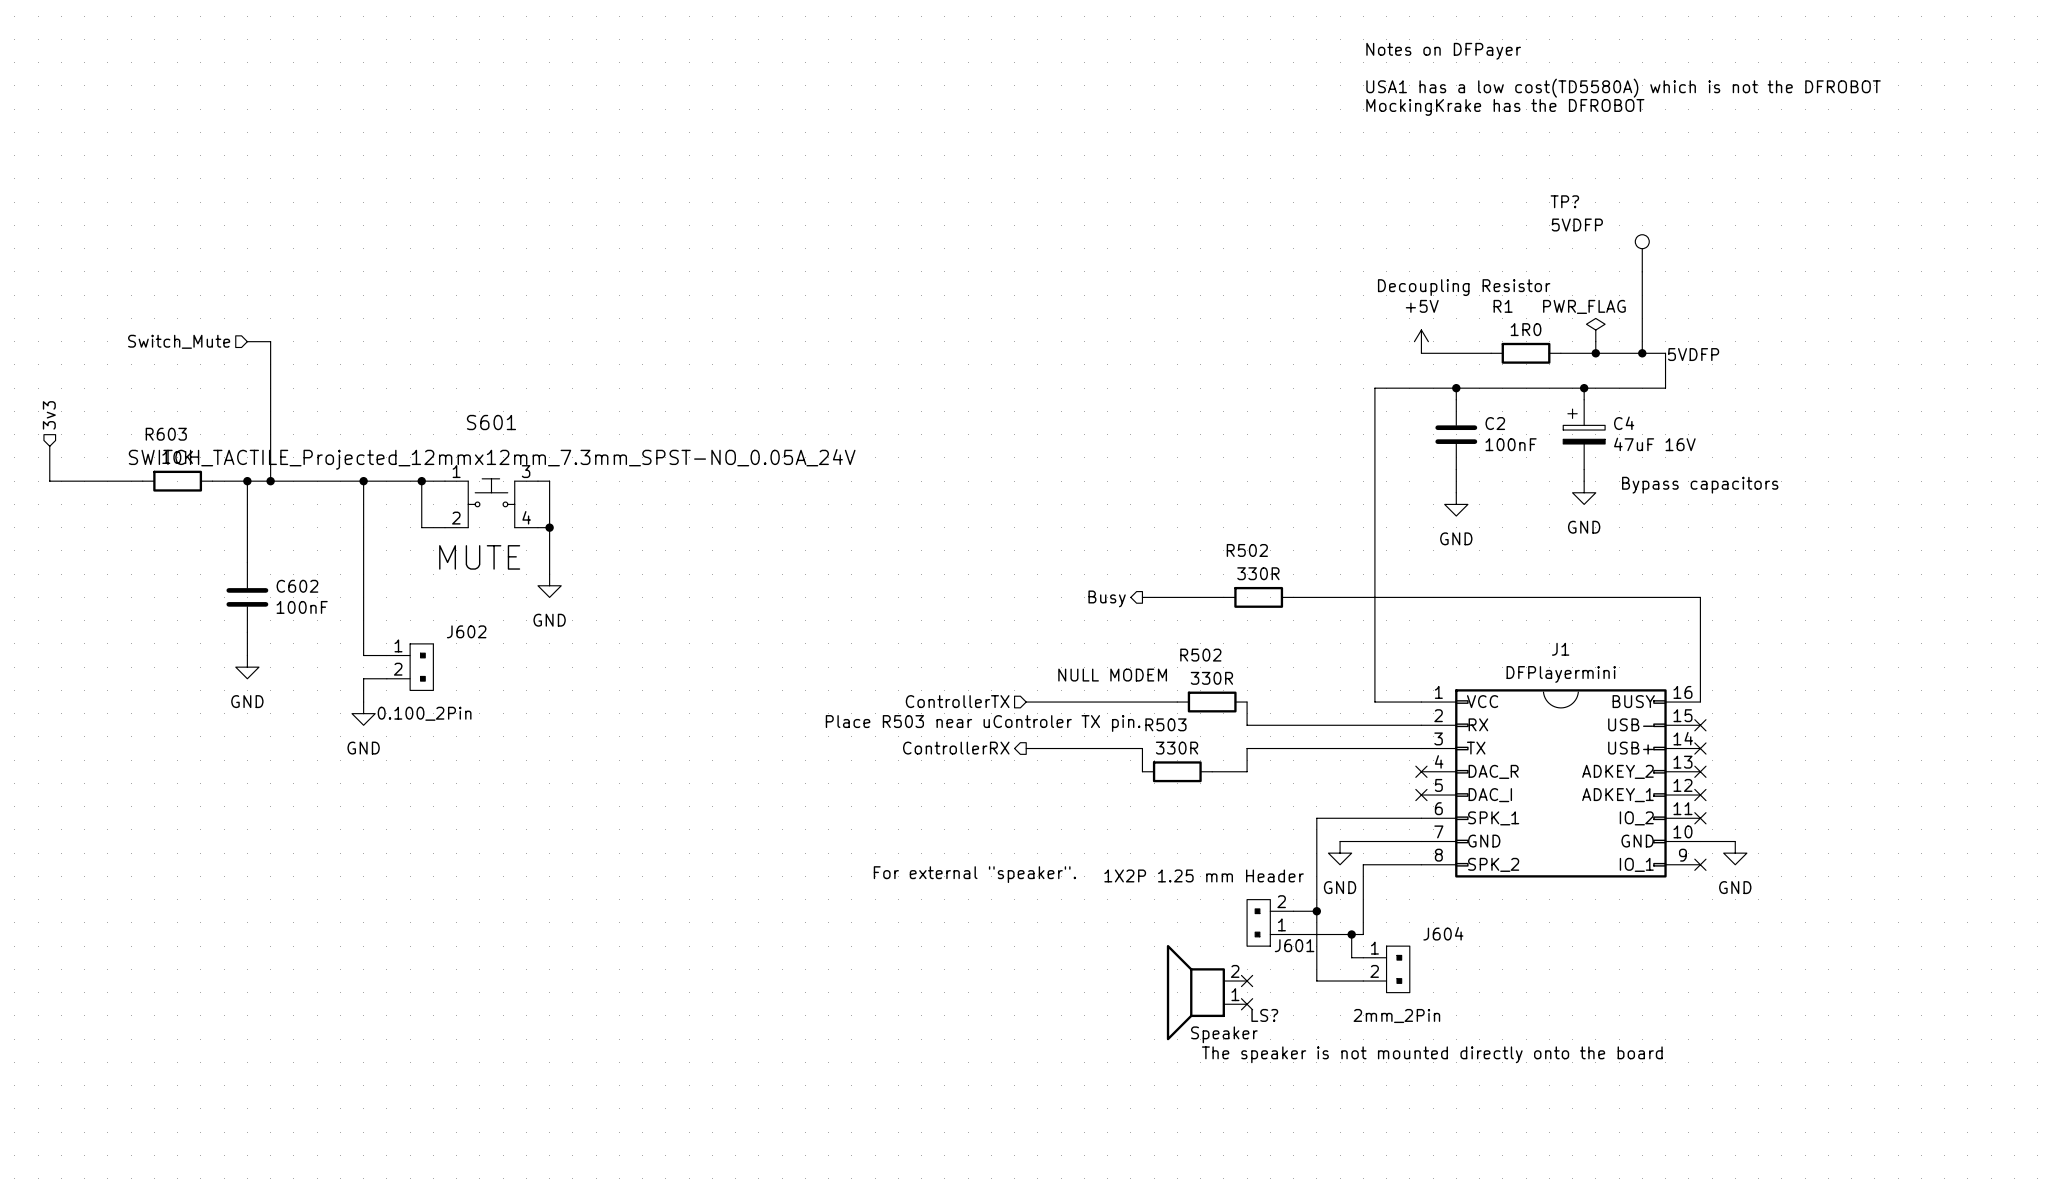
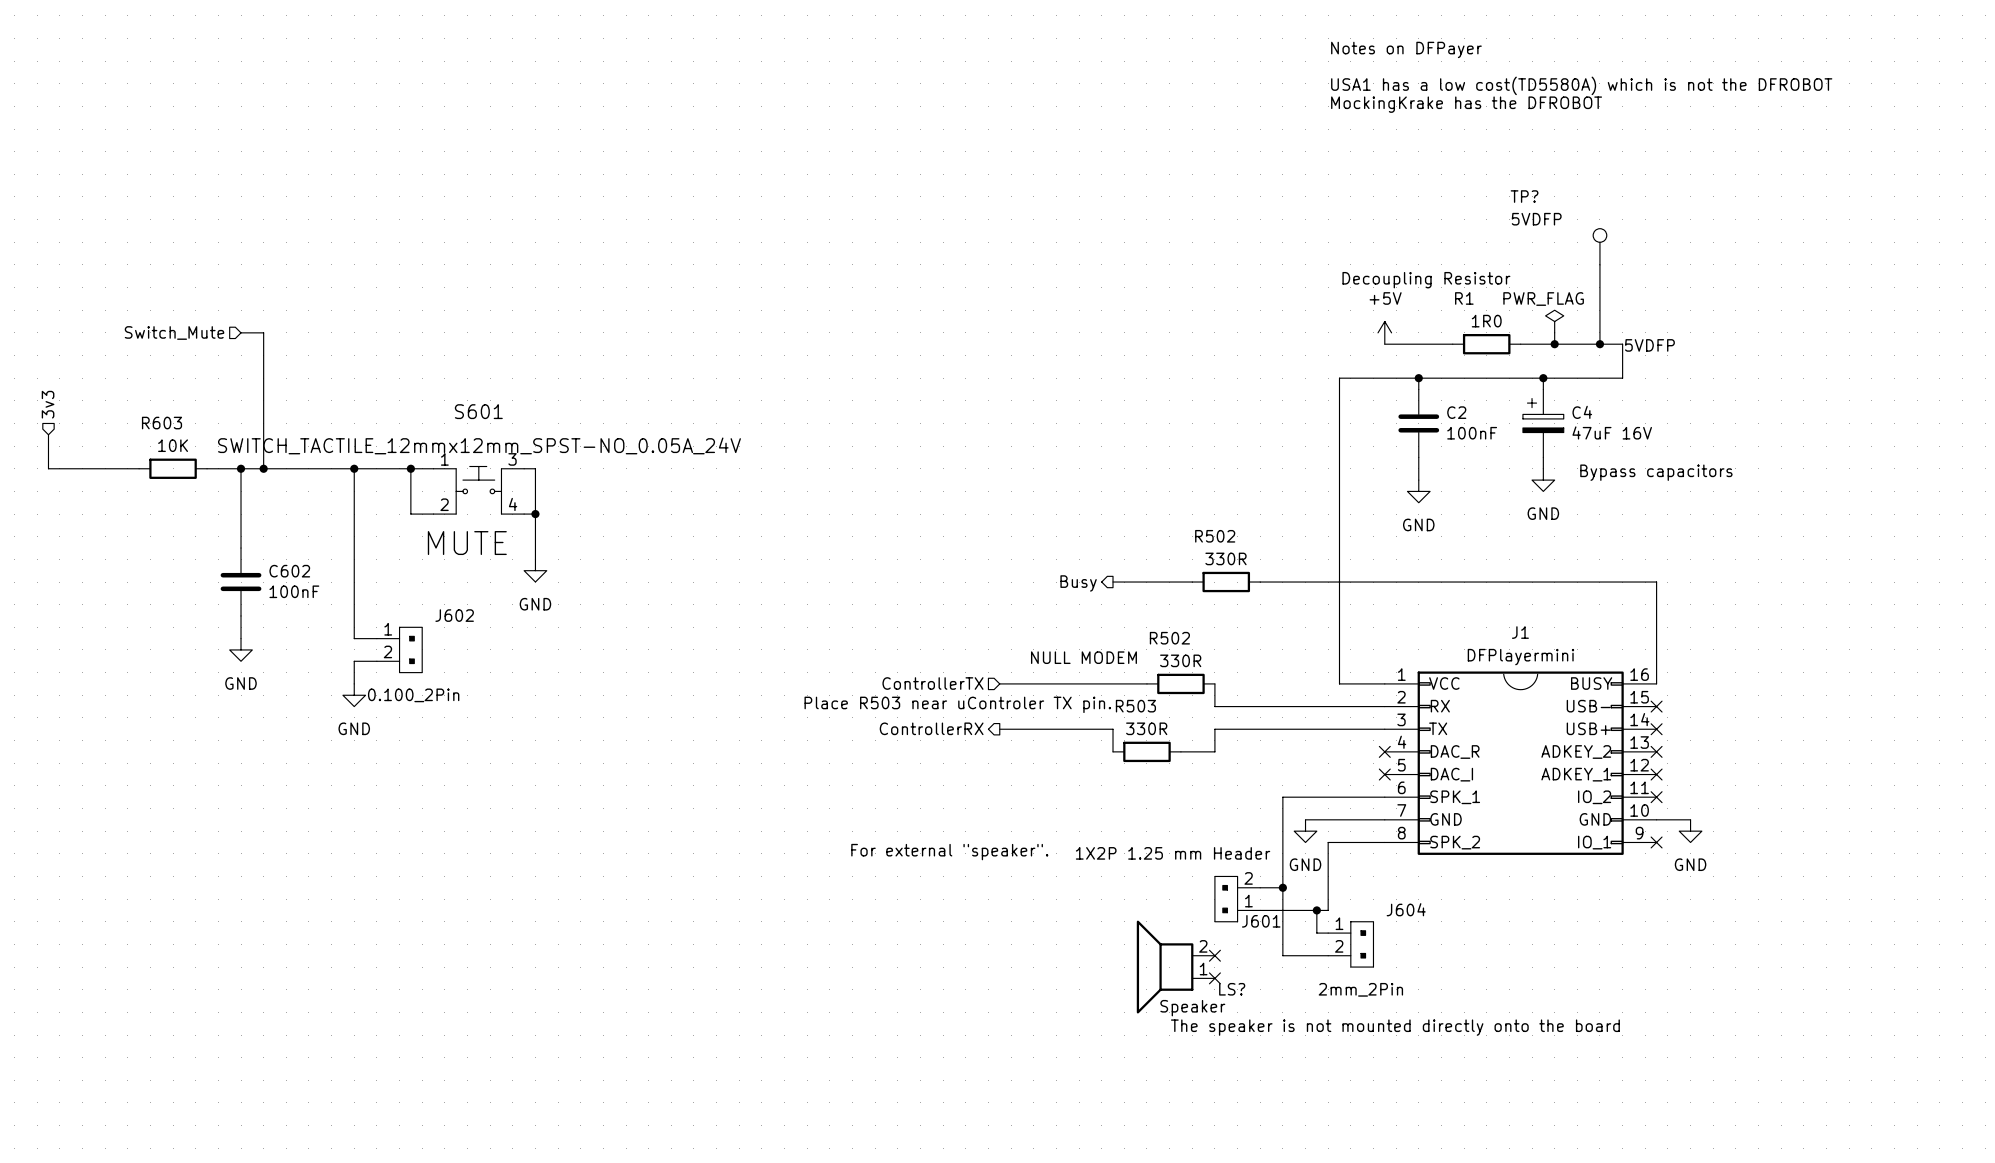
S601 value: SWITCH_TACTILE_Projected_12mmx12mm_7.3mm_SPST-NO_0.05A_24V (492, 459) -> SWITCH_TACTILE_12mmx12mm_SPST-NO_0.05A_24V (479, 445)

